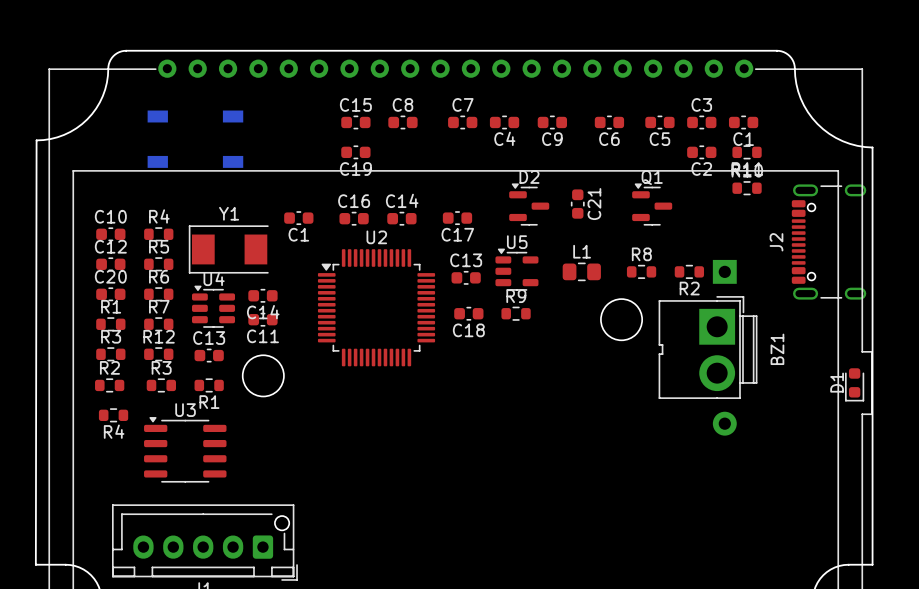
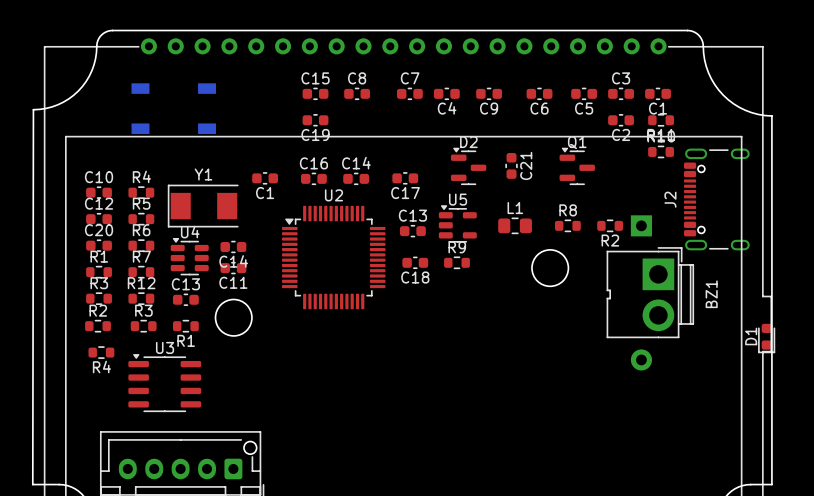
J2 position: (829, 242) -> (716, 199)
BZ1 position: (708, 347) -> (650, 292)
D1 position: (854, 384) -> (766, 338)

